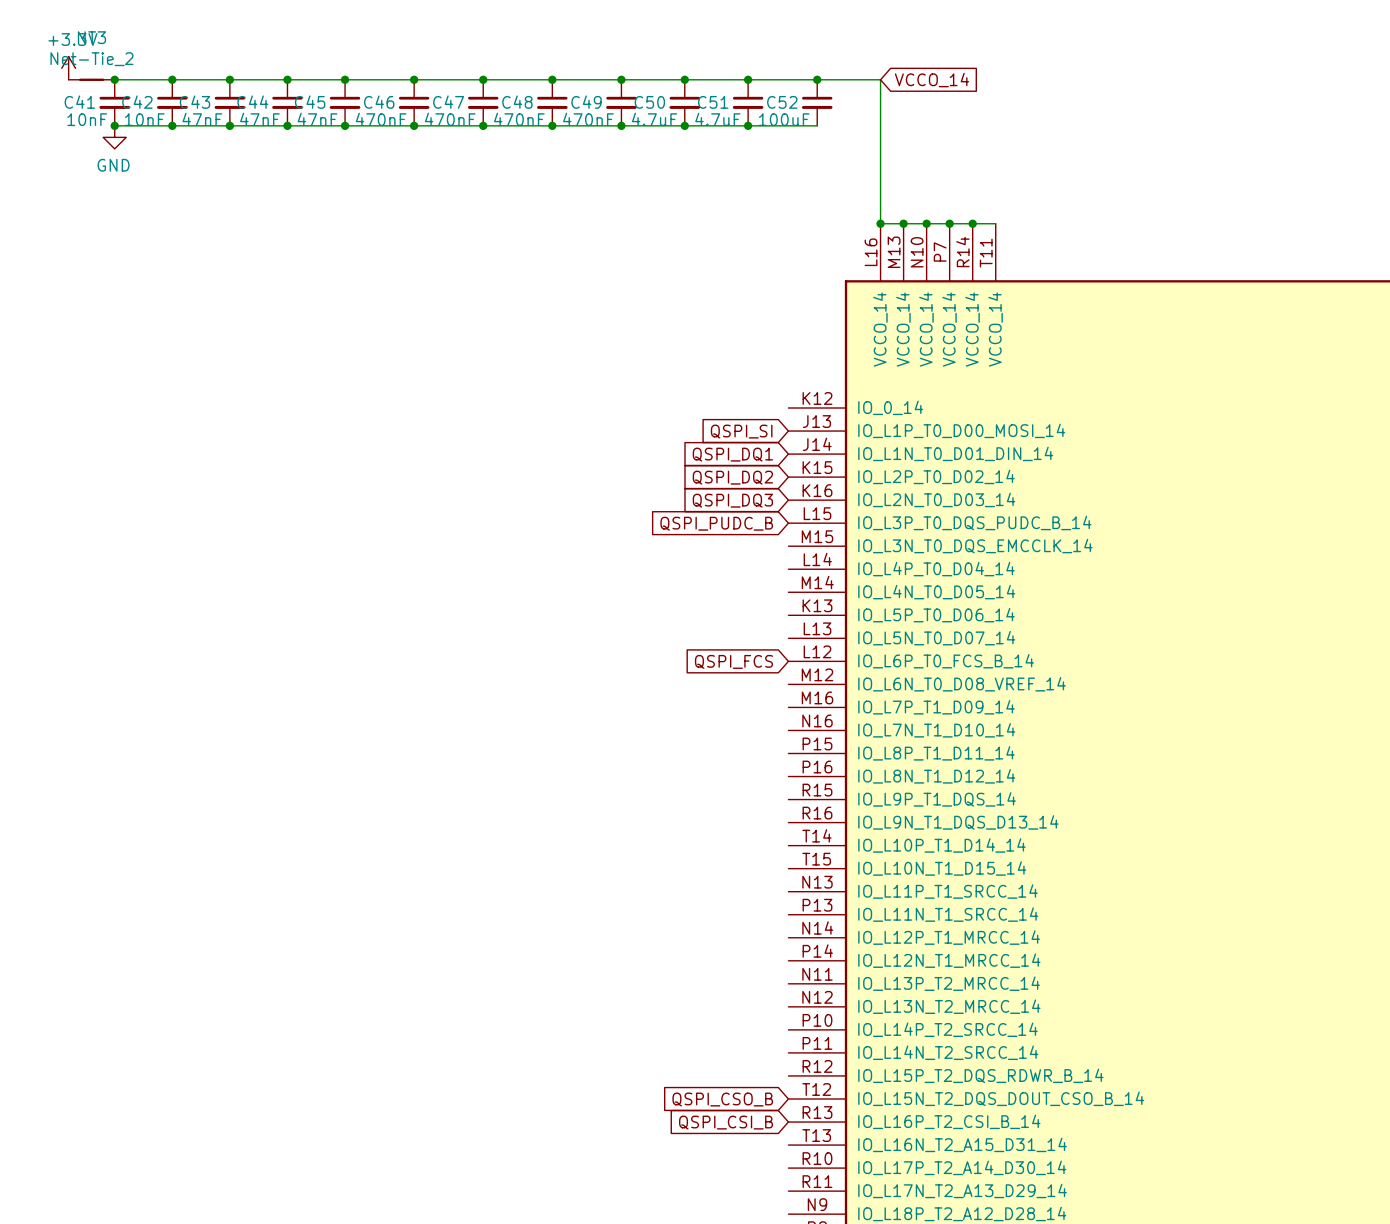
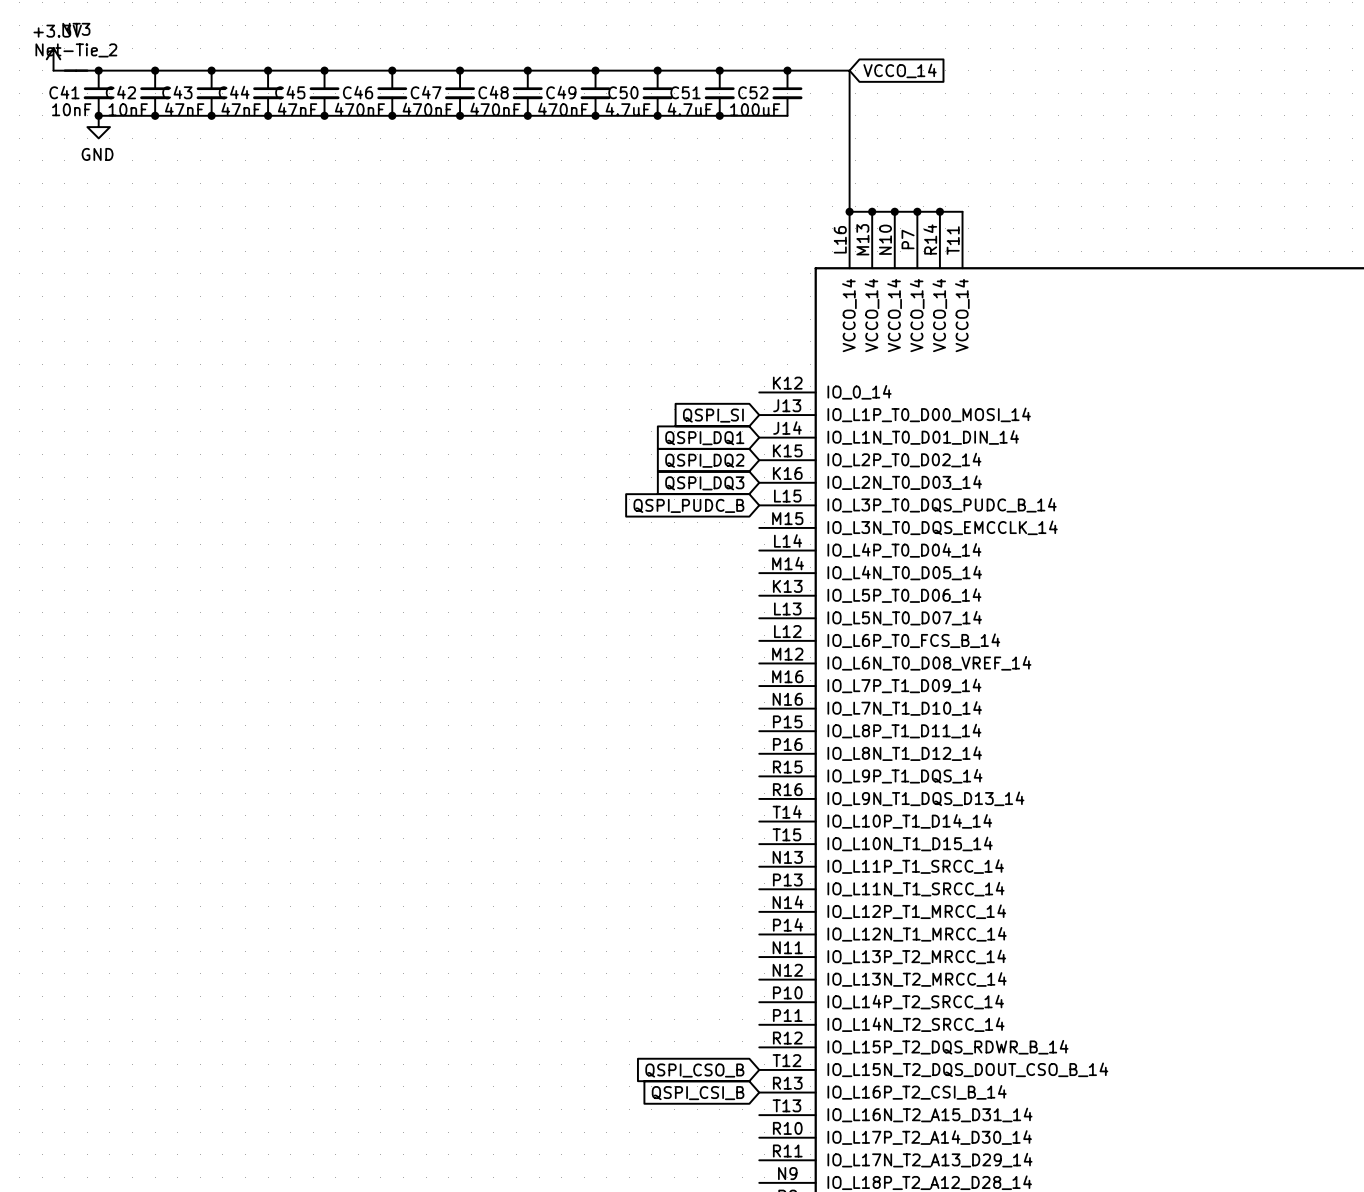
global label: QSPI_FCS (733, 661) -> none

